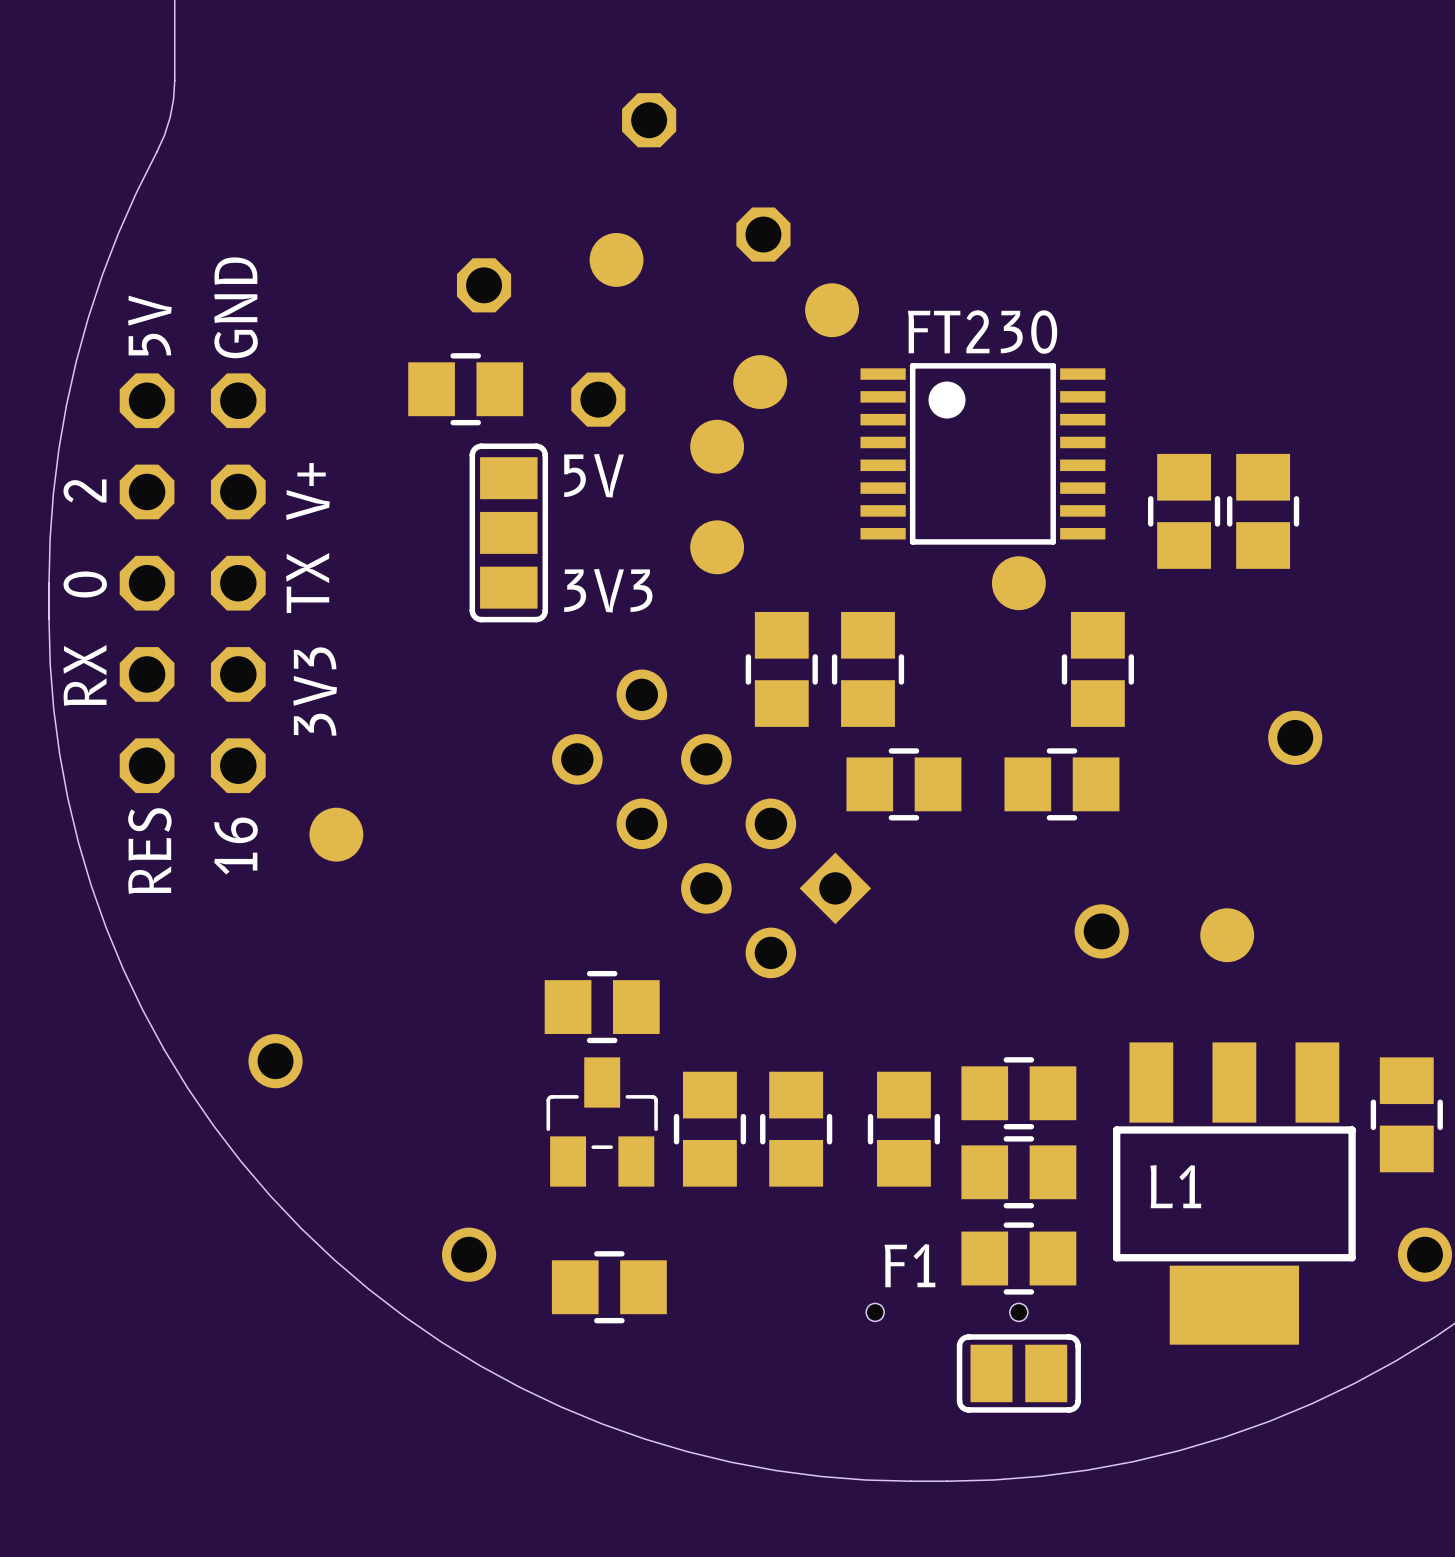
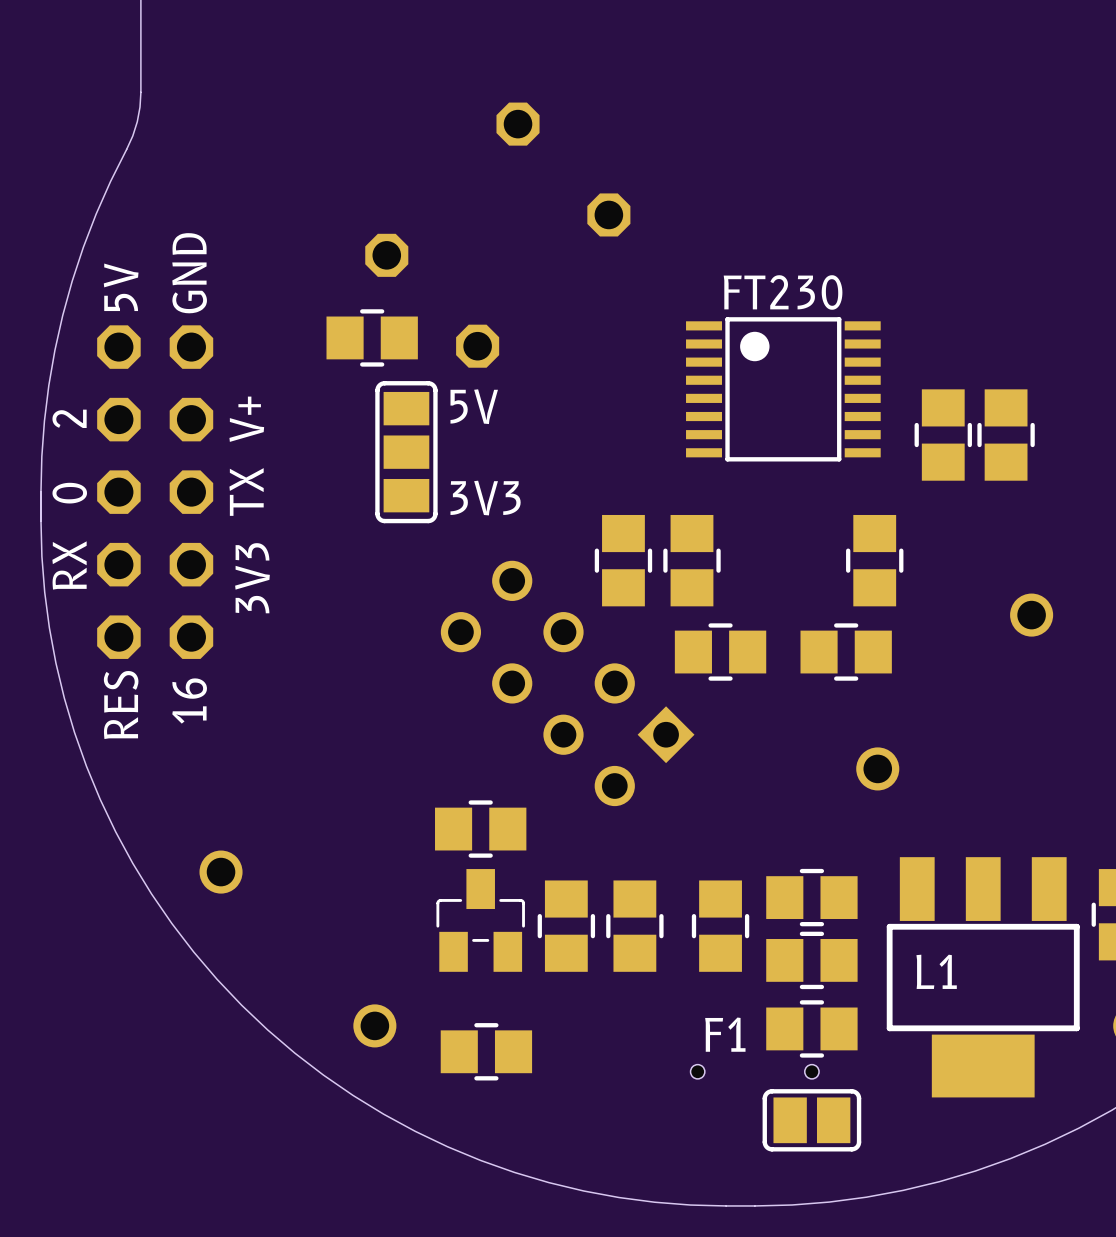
part: (616, 259) -> none
part: (832, 310) -> none
part: (760, 382) -> none
part: (717, 446) -> none
part: (717, 547) -> none
part: (1018, 583) -> none
part: (336, 834) -> none
part: (1227, 935) -> none

